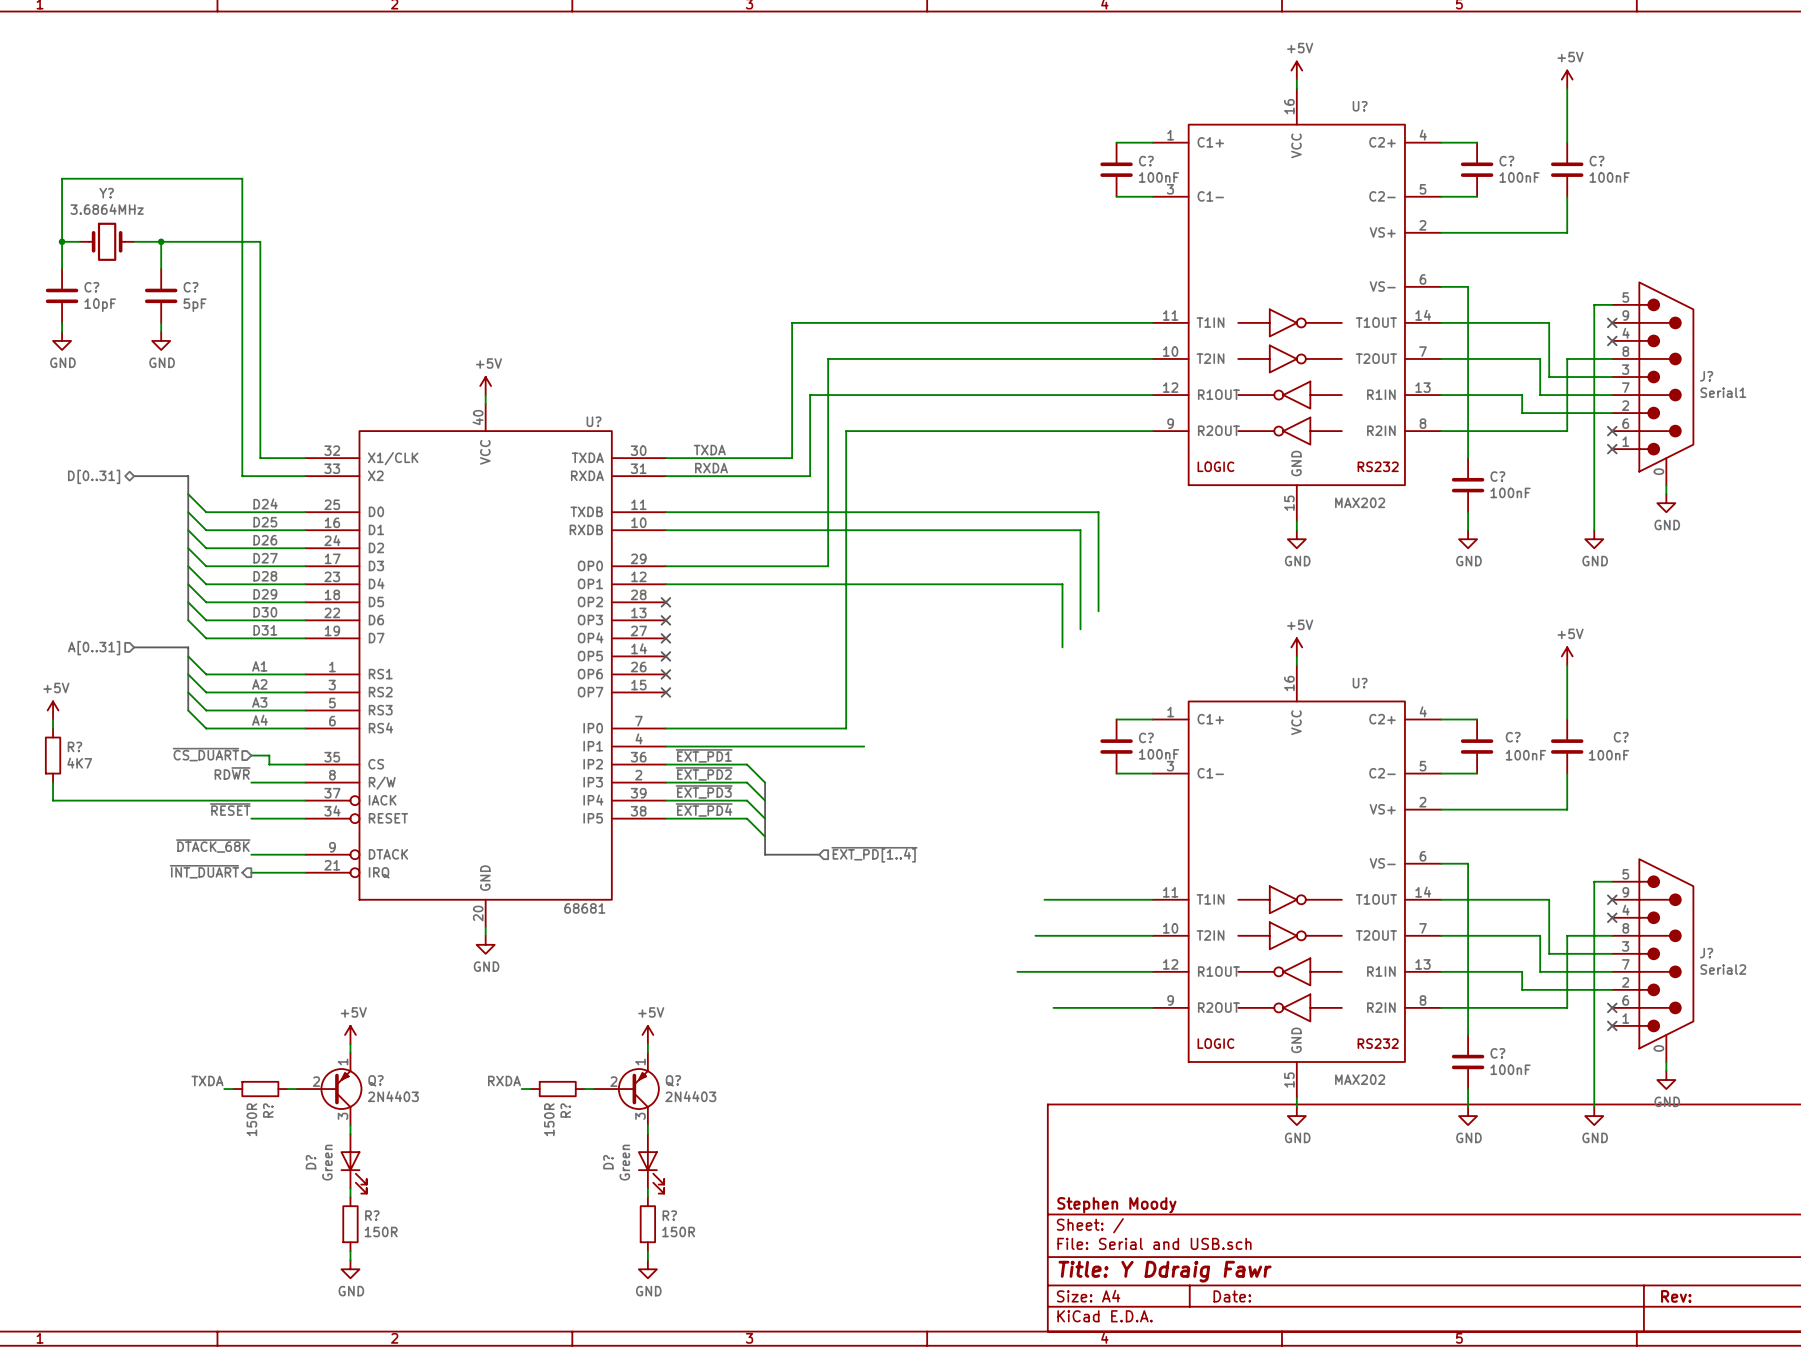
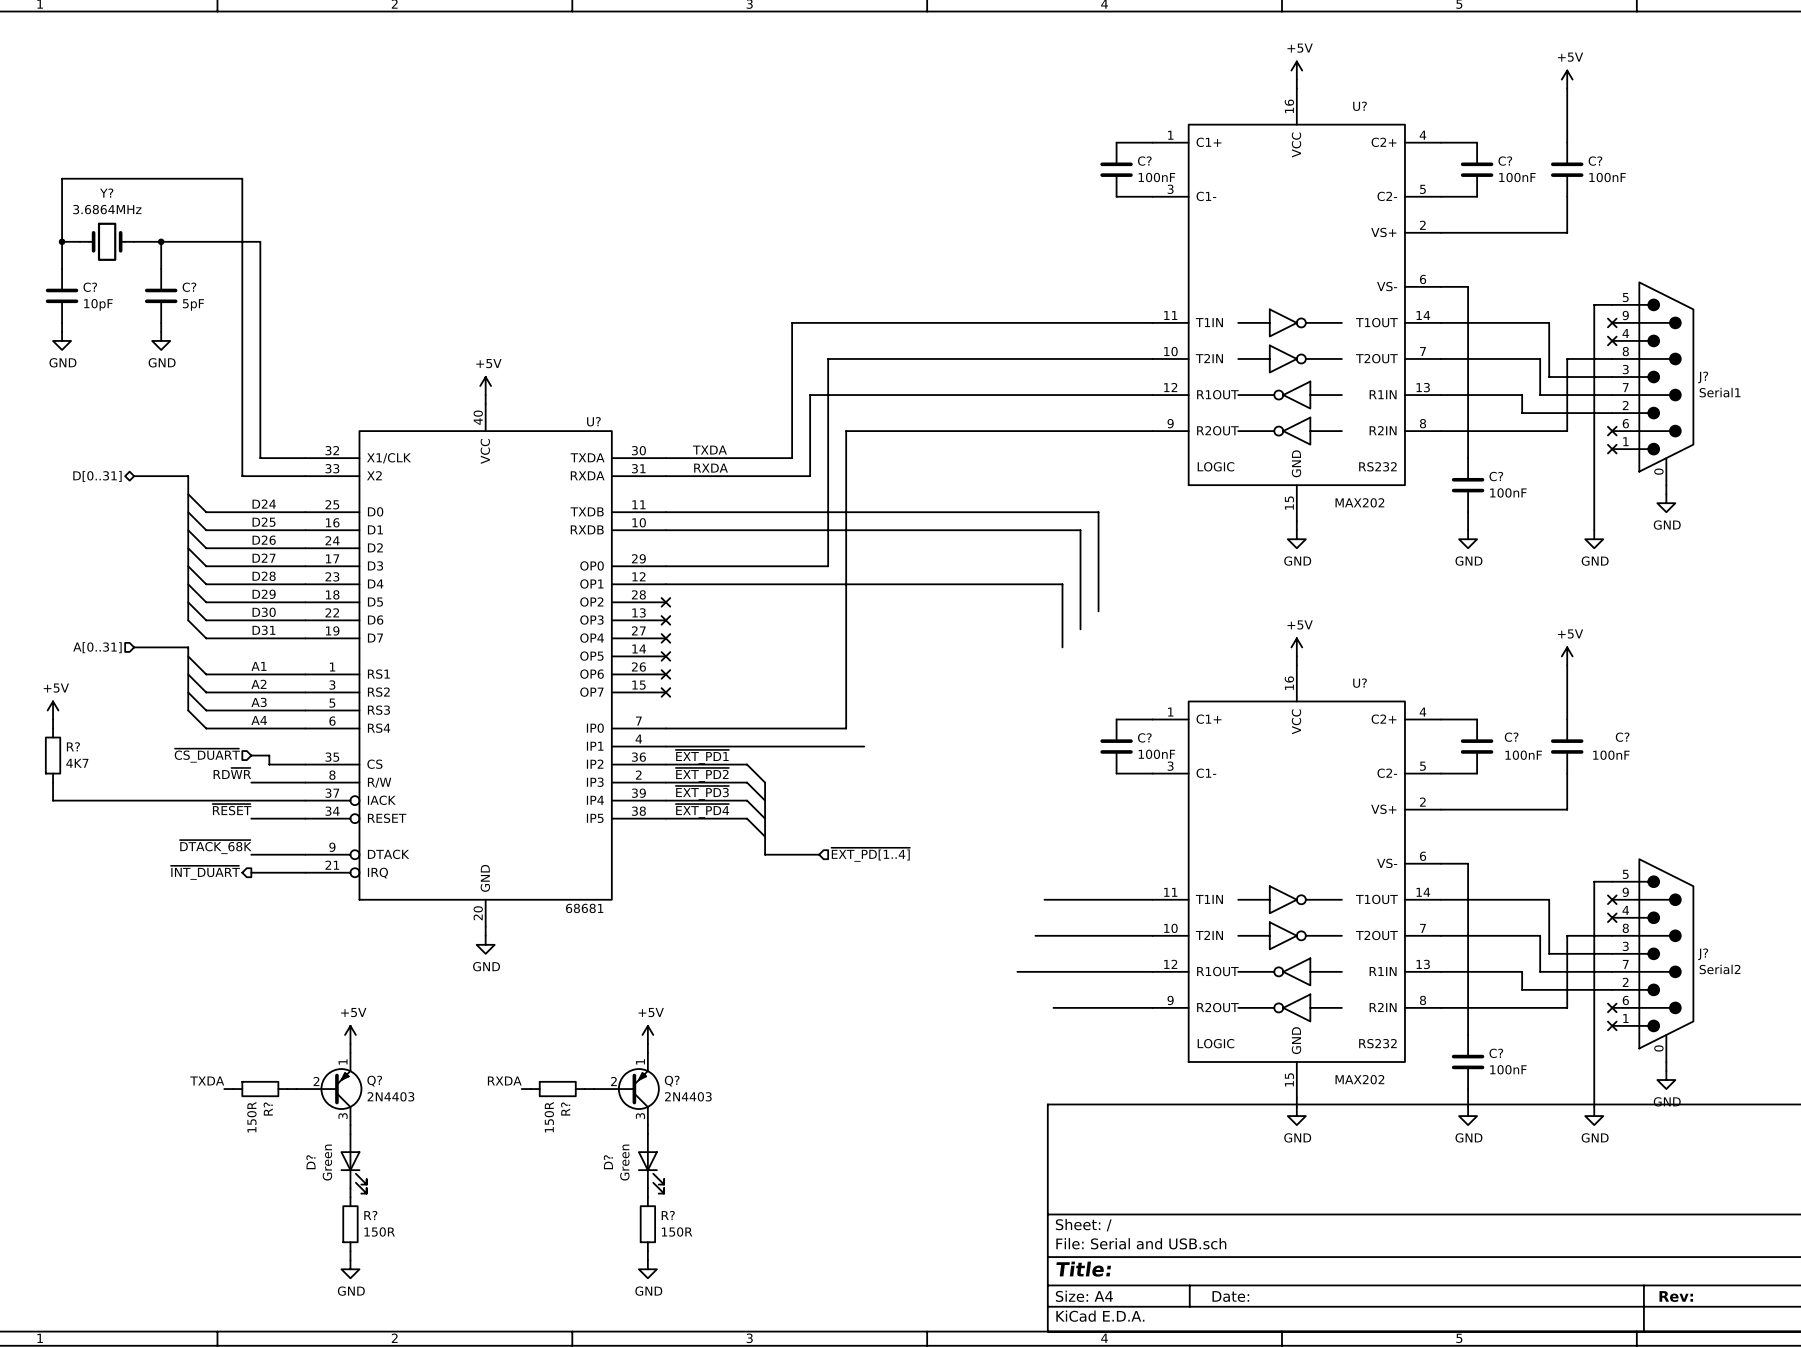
title block: Stephen Moody (1116, 1205) -> none
title block: Title: Y Ddraig Fawr (1165, 1271) -> Title: (1083, 1269)

